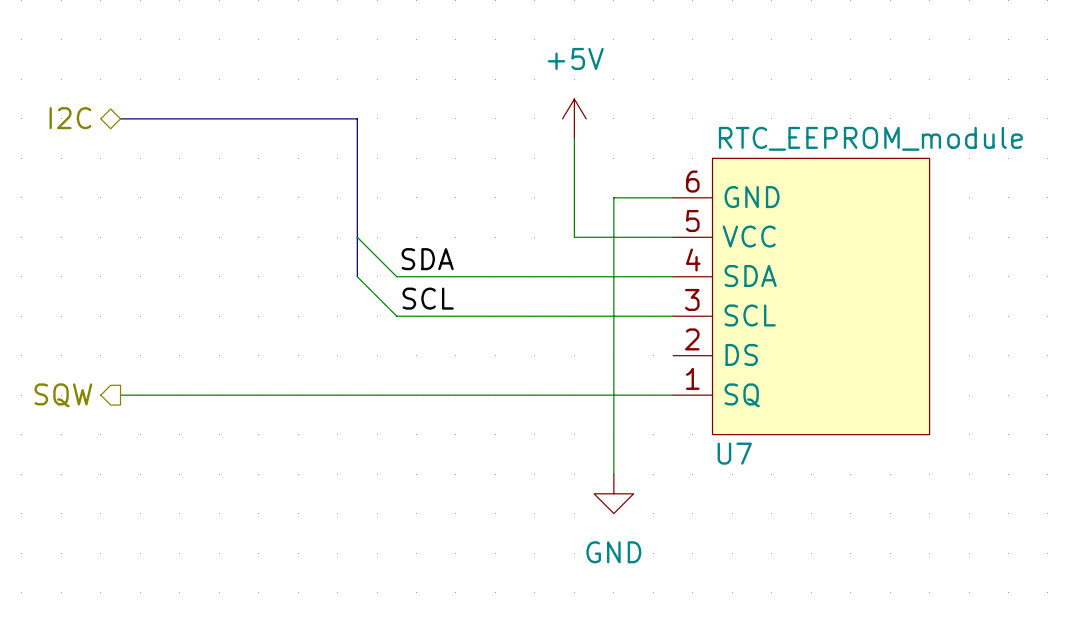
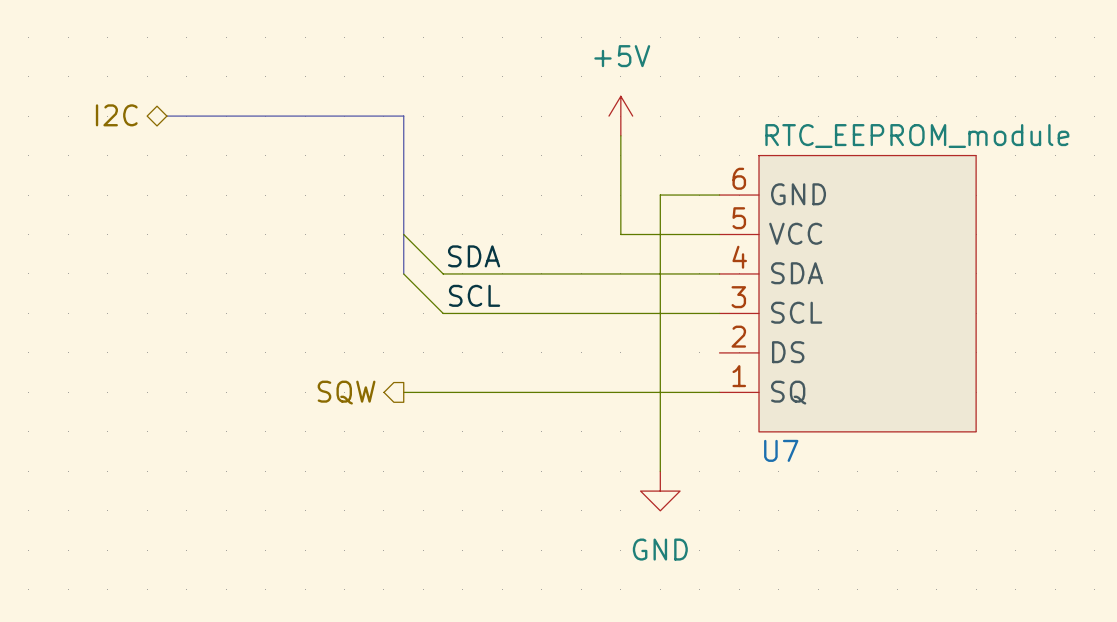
hierarchical label position: SQW (63, 395) -> SQW (346, 392)
wire: (120, 395) (357, 395) -> none

